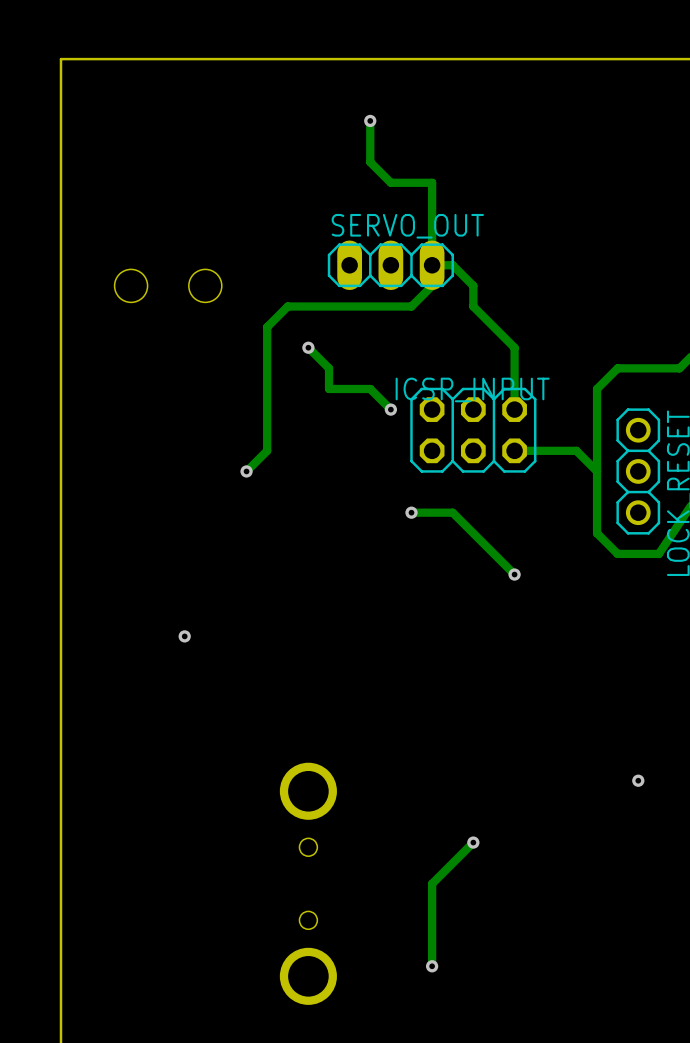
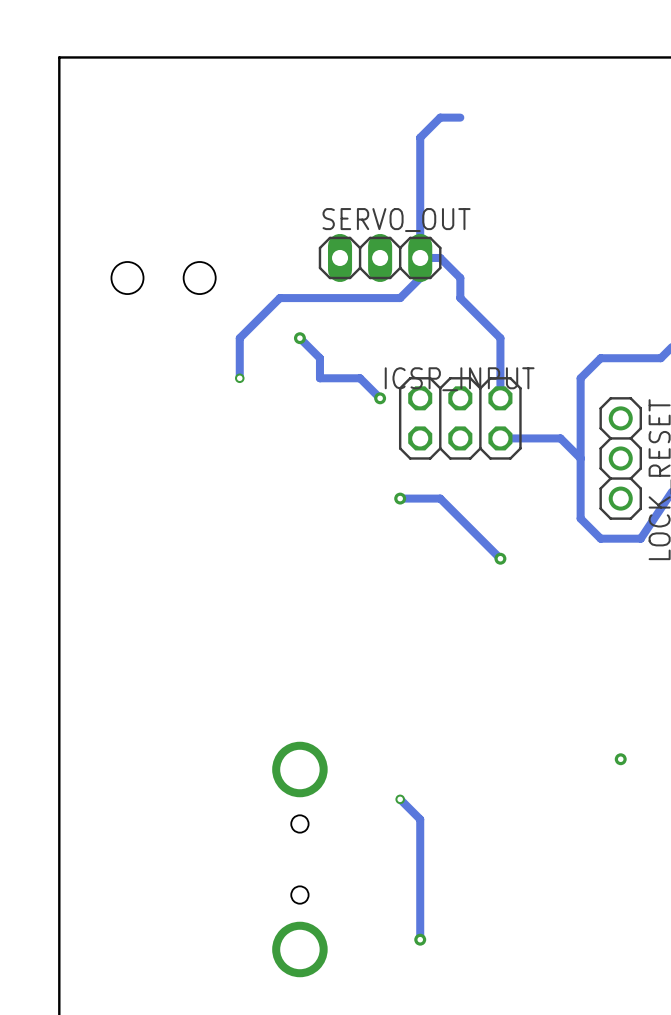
track: (370, 120) (370, 162) (390, 182) (432, 182) -> (460, 117) (440, 117) (420, 137) (420, 177)
via: (370, 120) -> none
track: (267, 327) (267, 450) (246, 471) -> (259, 318) (239, 338) (239, 378)
via: none -> (239, 378)
via: (246, 471) -> none
via: (184, 636) -> none
via: none -> (400, 799)
track: (473, 842) (432, 883) -> (400, 799) (420, 819) (420, 859)
via: (473, 842) -> none

